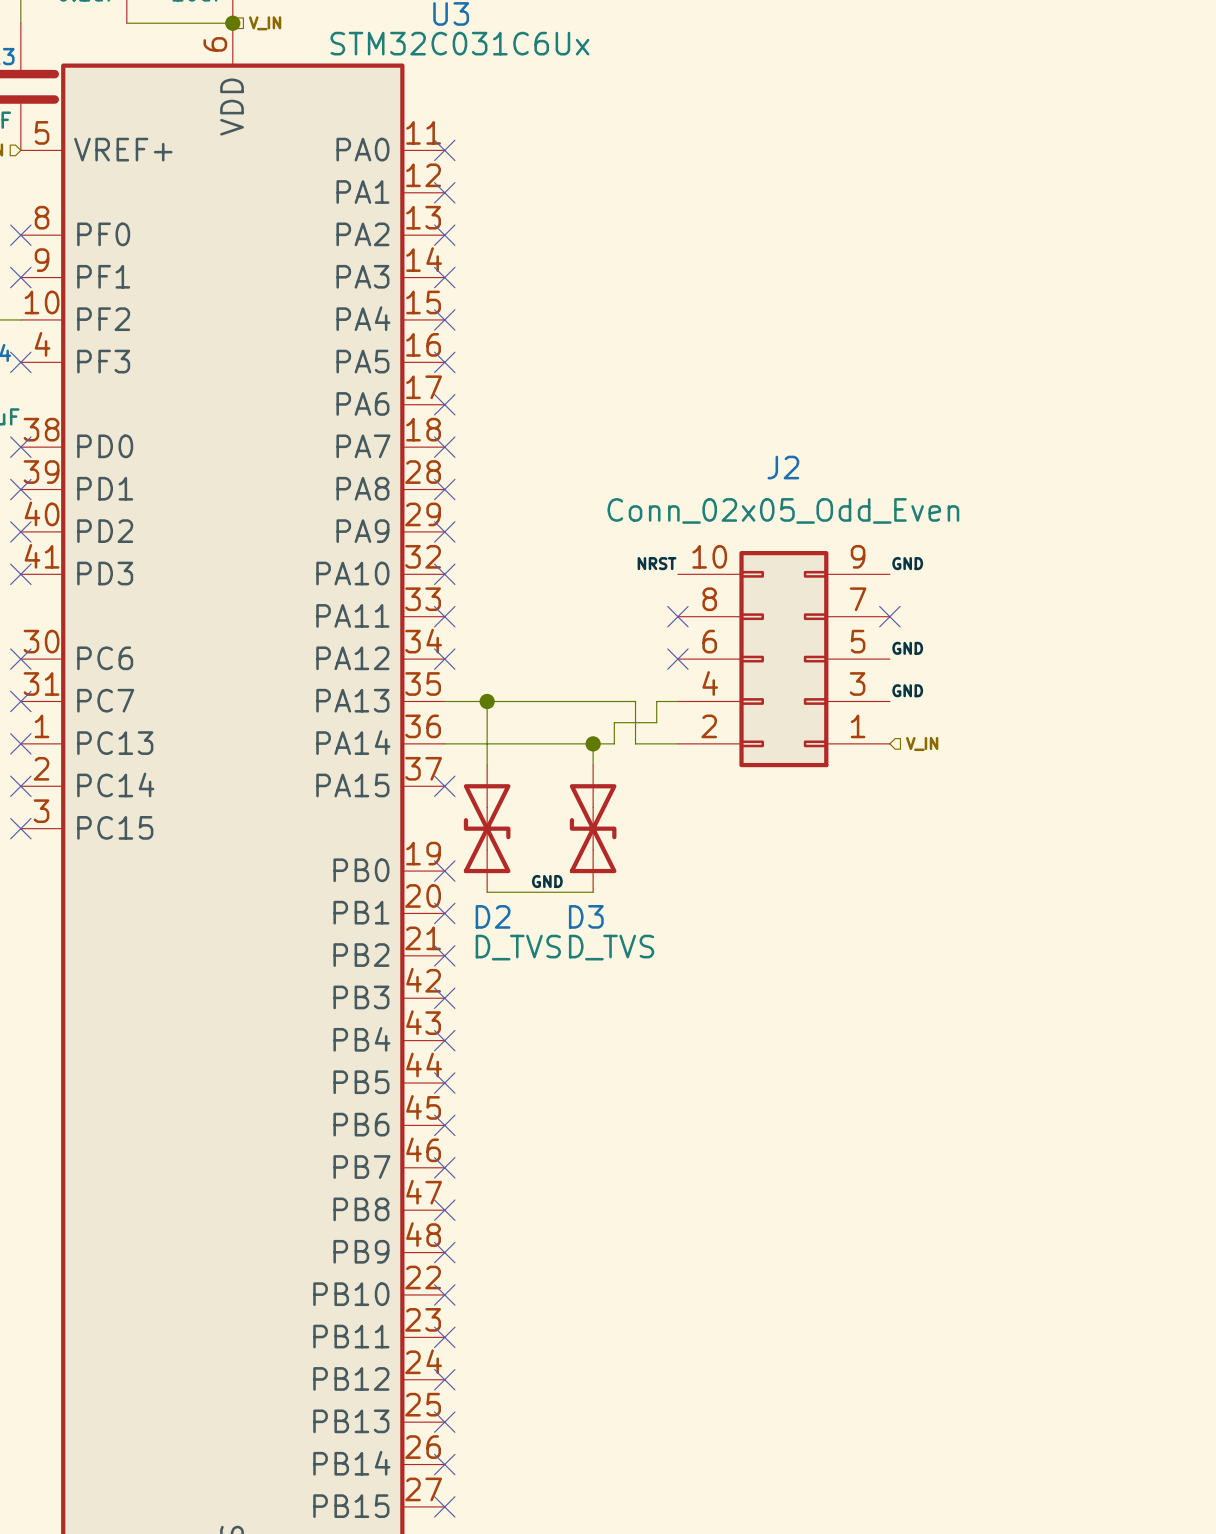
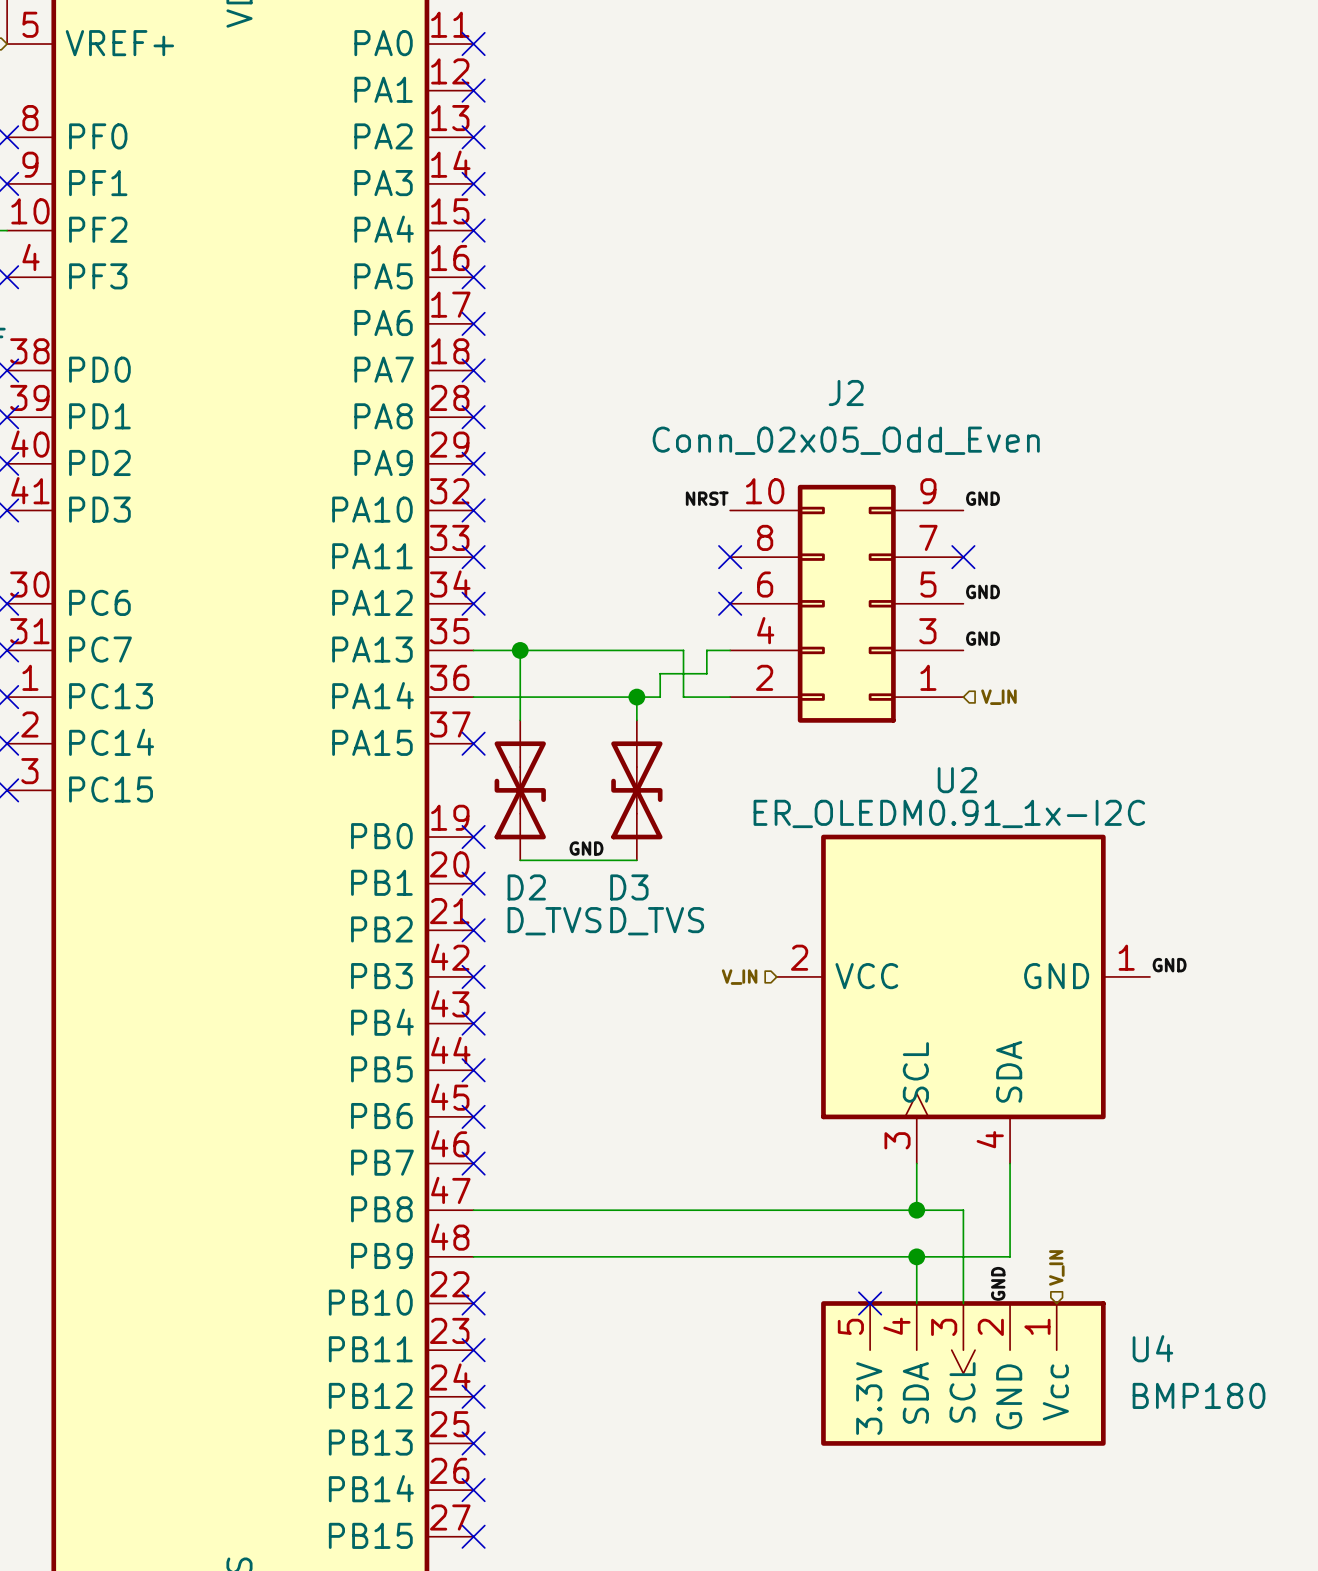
label: none -> GND (1169, 965)
hierarchical label: none -> V_IN (739, 977)
U2: none -> ER_OLEDM0.91_1x-I2C (963, 999)
wire: none -> (916, 1163) (916, 1210)
wire: none -> (1010, 1163) (1010, 1256) (473, 1256)
wire: none -> (473, 1210) (963, 1210) (963, 1303)
no-connect mark: (444, 1210) -> none
junction: none -> (916, 1210)
no-connect mark: (444, 1252) -> none
wire: none -> (916, 1256) (916, 1303)
junction: none -> (916, 1256)
hierarchical label: none -> V_IN (1056, 1267)
label: none -> GND (998, 1283)
no-connect mark: none -> (870, 1303)
U4: none -> BMP180 (963, 1373)

